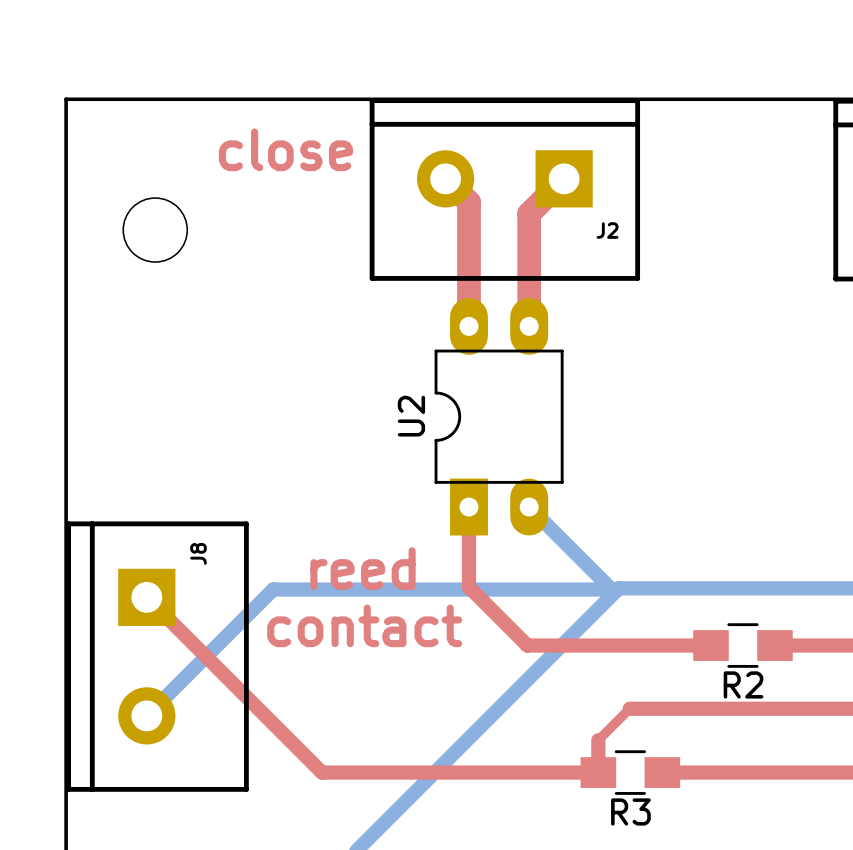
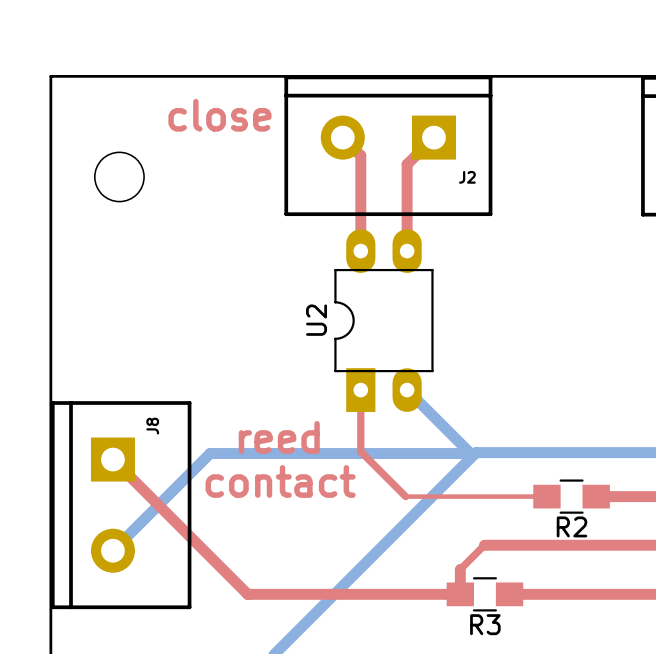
top track width: thick (445, 178) (468, 202) (468, 326) -> thin (342, 137) (360, 155) (360, 251)
top track width: thick (564, 178) (529, 213) (529, 326) -> thin (433, 137) (407, 164) (407, 251)
top track width: thick (468, 507) (468, 587) (527, 645) (710, 645) -> thin (360, 390) (360, 451) (405, 496) (546, 496)

